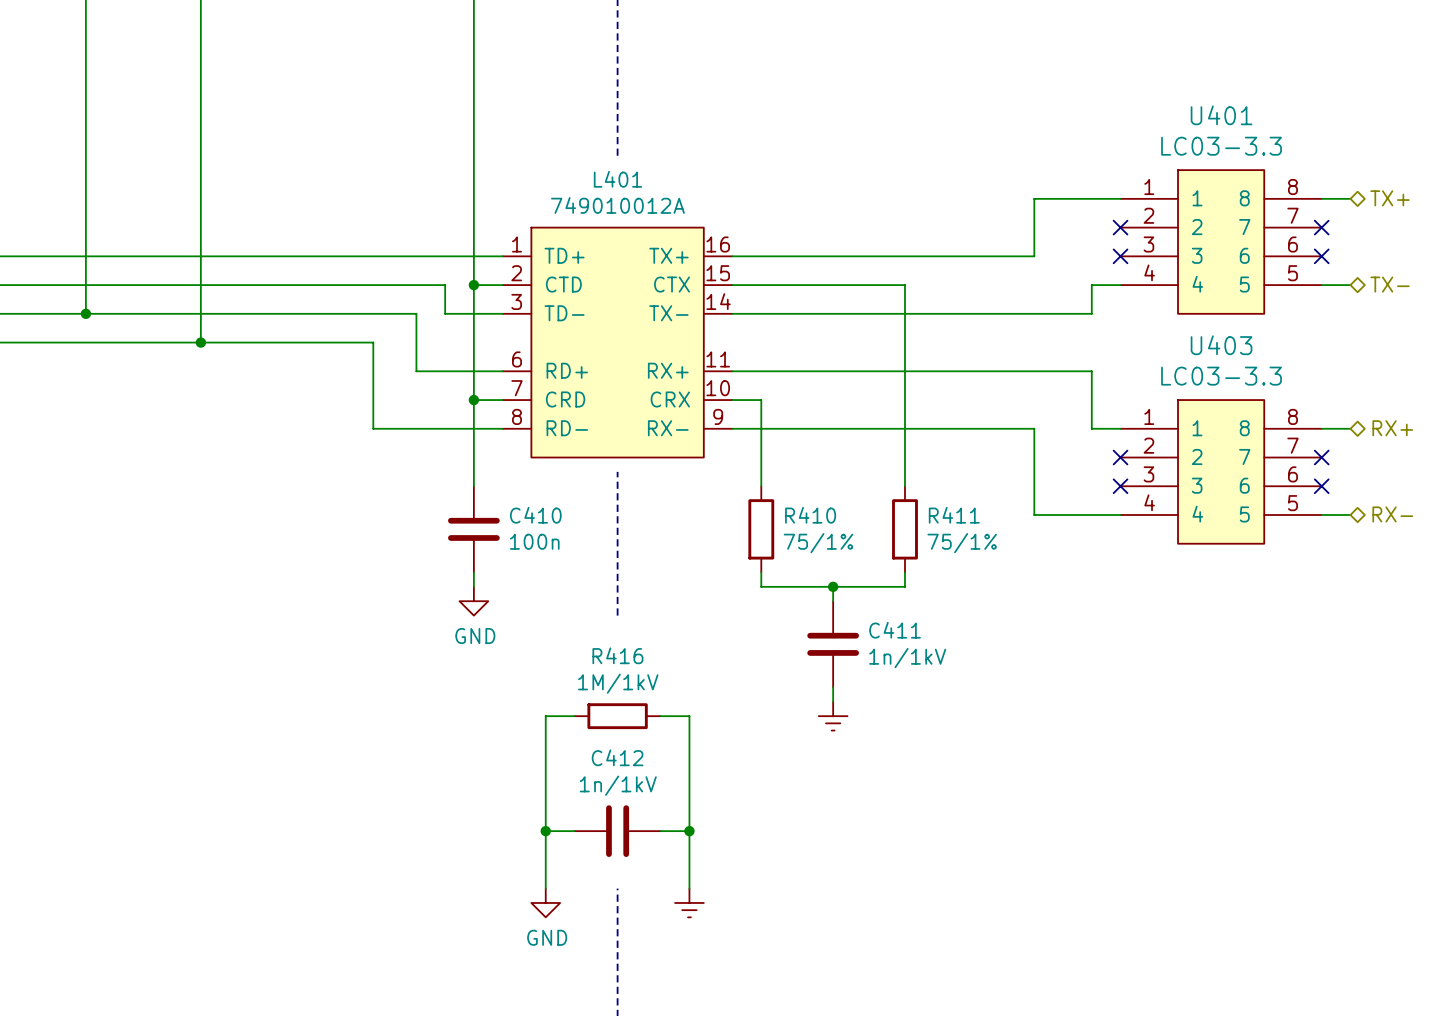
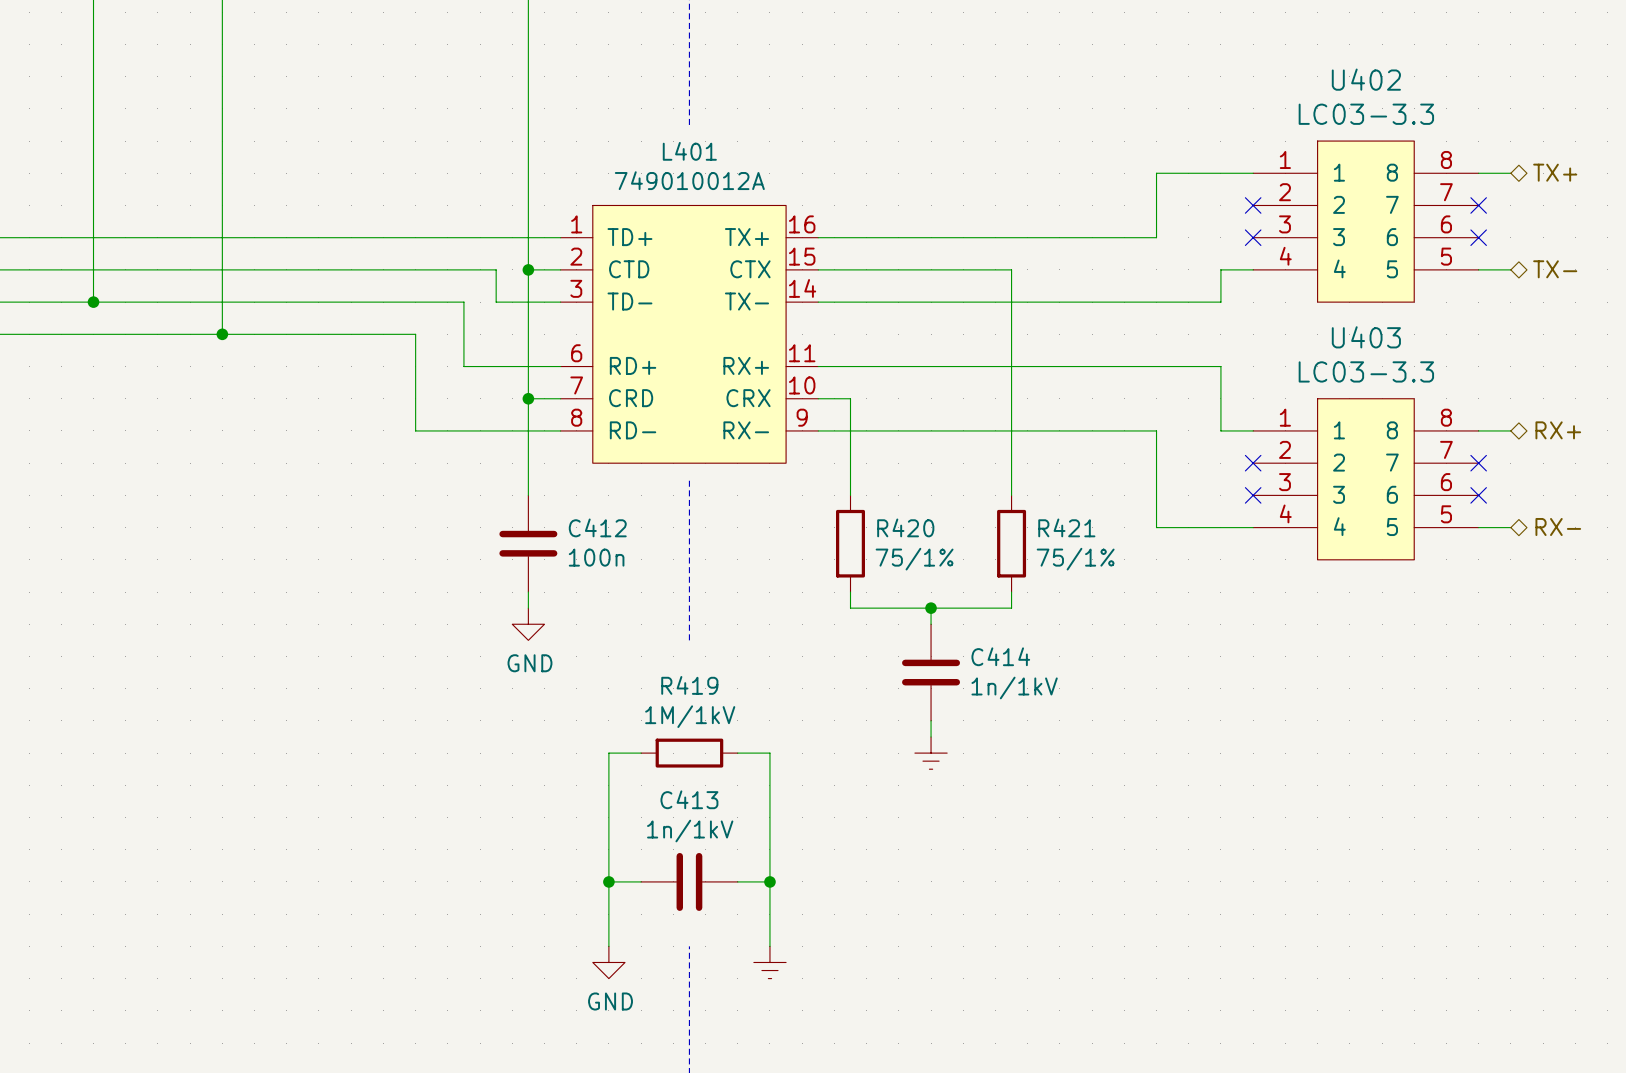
U401 name: U401 (1221, 115) -> U402 (1366, 79)
C410 name: C410 (535, 515) -> C412 (597, 527)
R410 name: R410 (810, 515) -> R420 (905, 527)
R411 name: R411 (954, 515) -> R421 (1066, 527)
C411 name: C411 (895, 630) -> C414 (1000, 656)
R416 name: R416 (617, 655) -> R419 (689, 685)
C412 name: C412 (617, 757) -> C413 (689, 799)

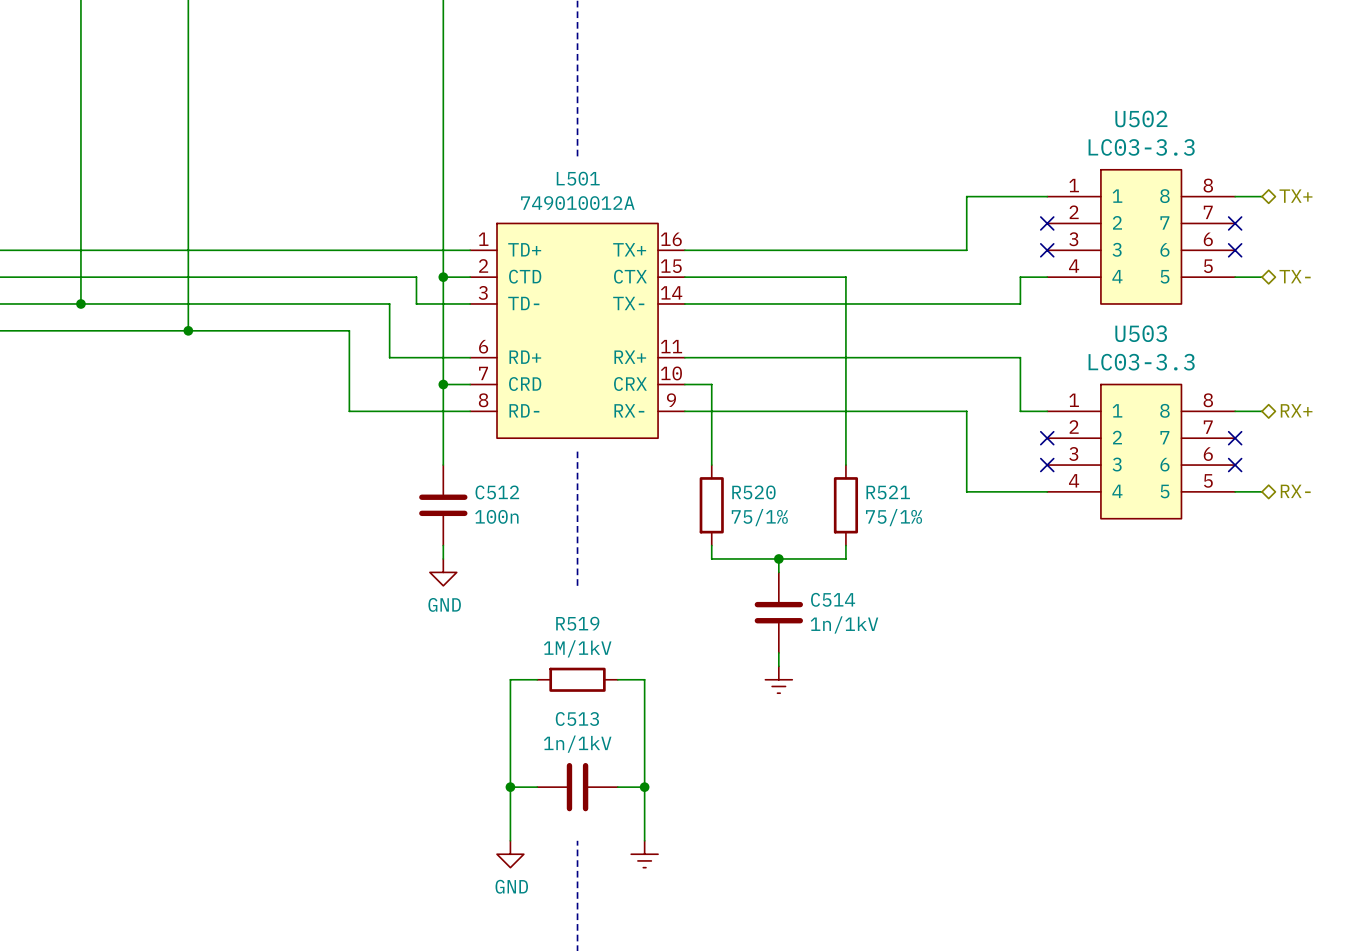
U402 name: U402 (1366, 79) -> U502 (1141, 118)
L401 name: L401 (689, 151) -> L501 (578, 178)
U403 name: U403 (1366, 337) -> U503 (1141, 333)
C412 name: C412 (597, 527) -> C512 (497, 492)
R420 name: R420 (905, 527) -> R520 (753, 492)
R421 name: R421 (1066, 527) -> R521 (888, 492)
C414 name: C414 (1000, 656) -> C514 (833, 599)
R419 name: R419 (689, 685) -> R519 (577, 623)
C413 name: C413 (689, 799) -> C513 (577, 718)

